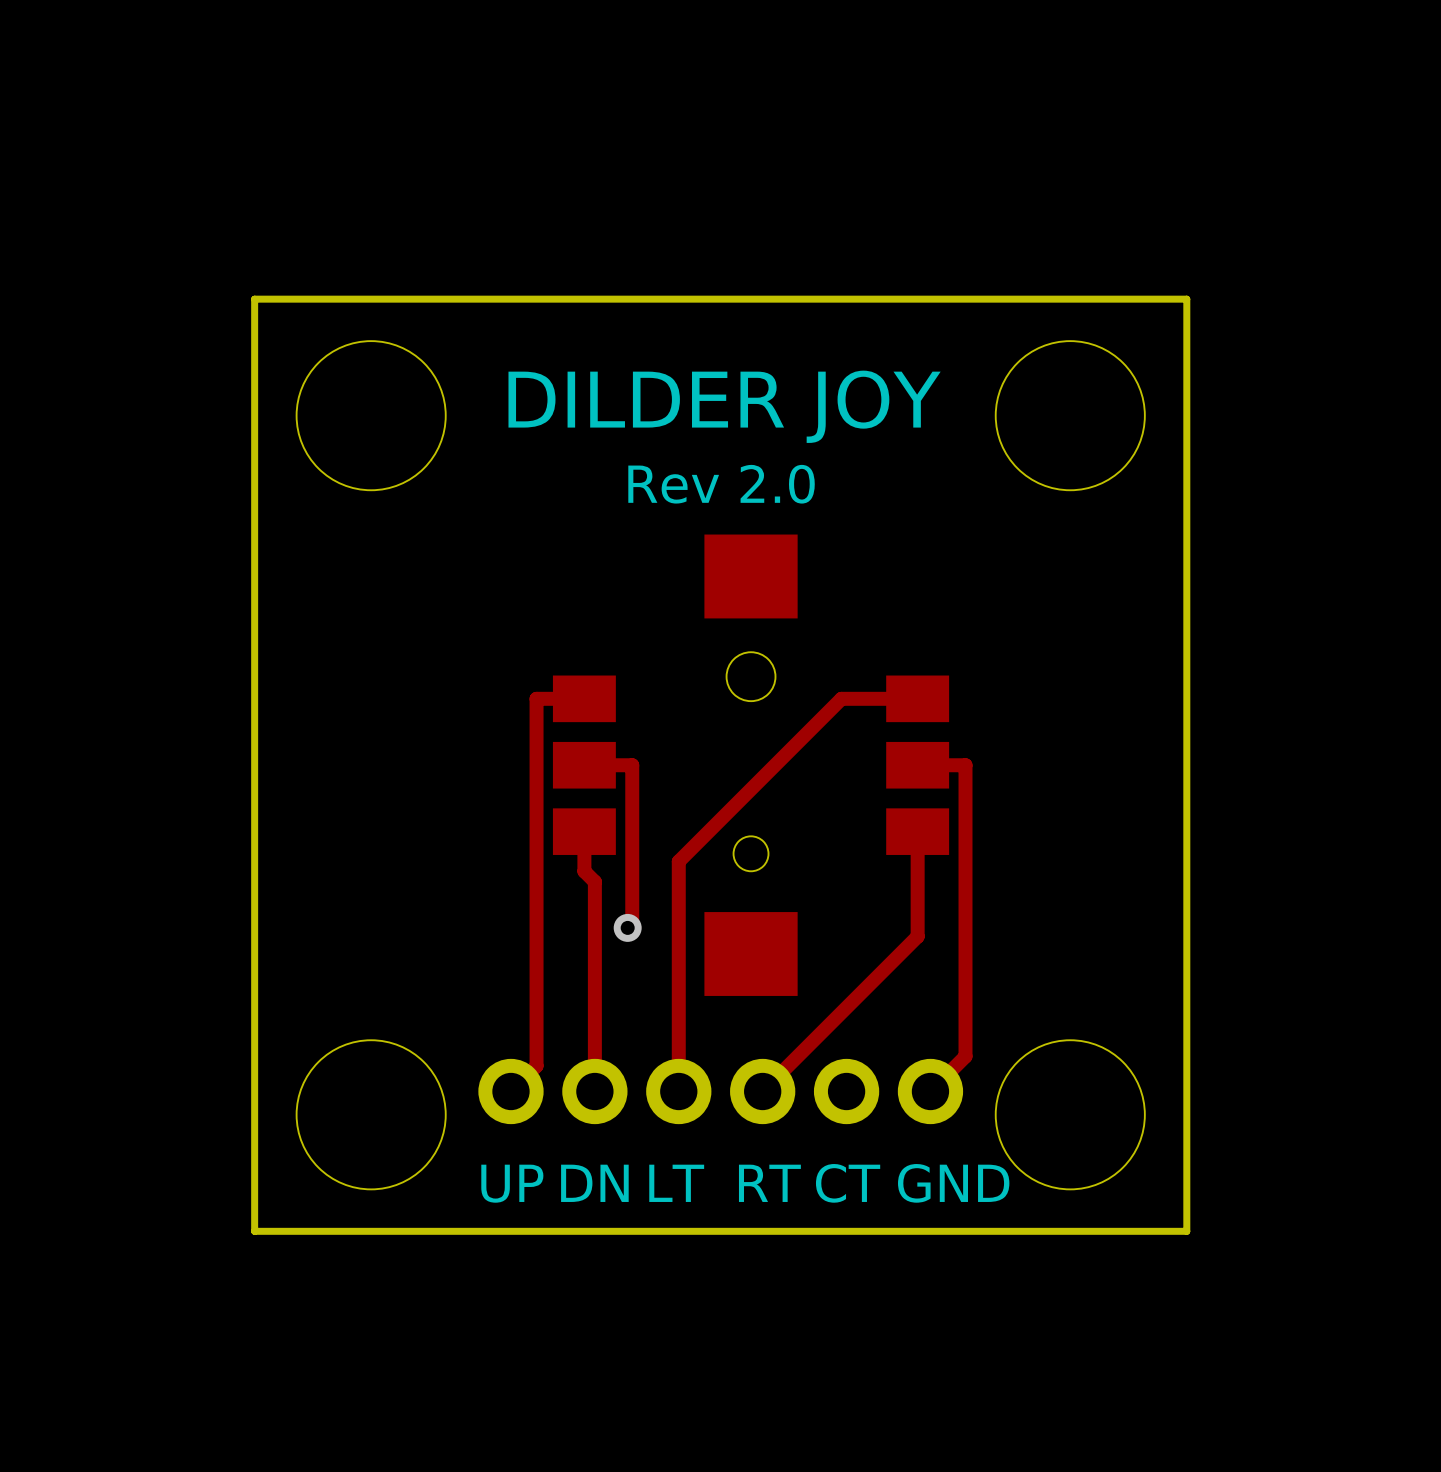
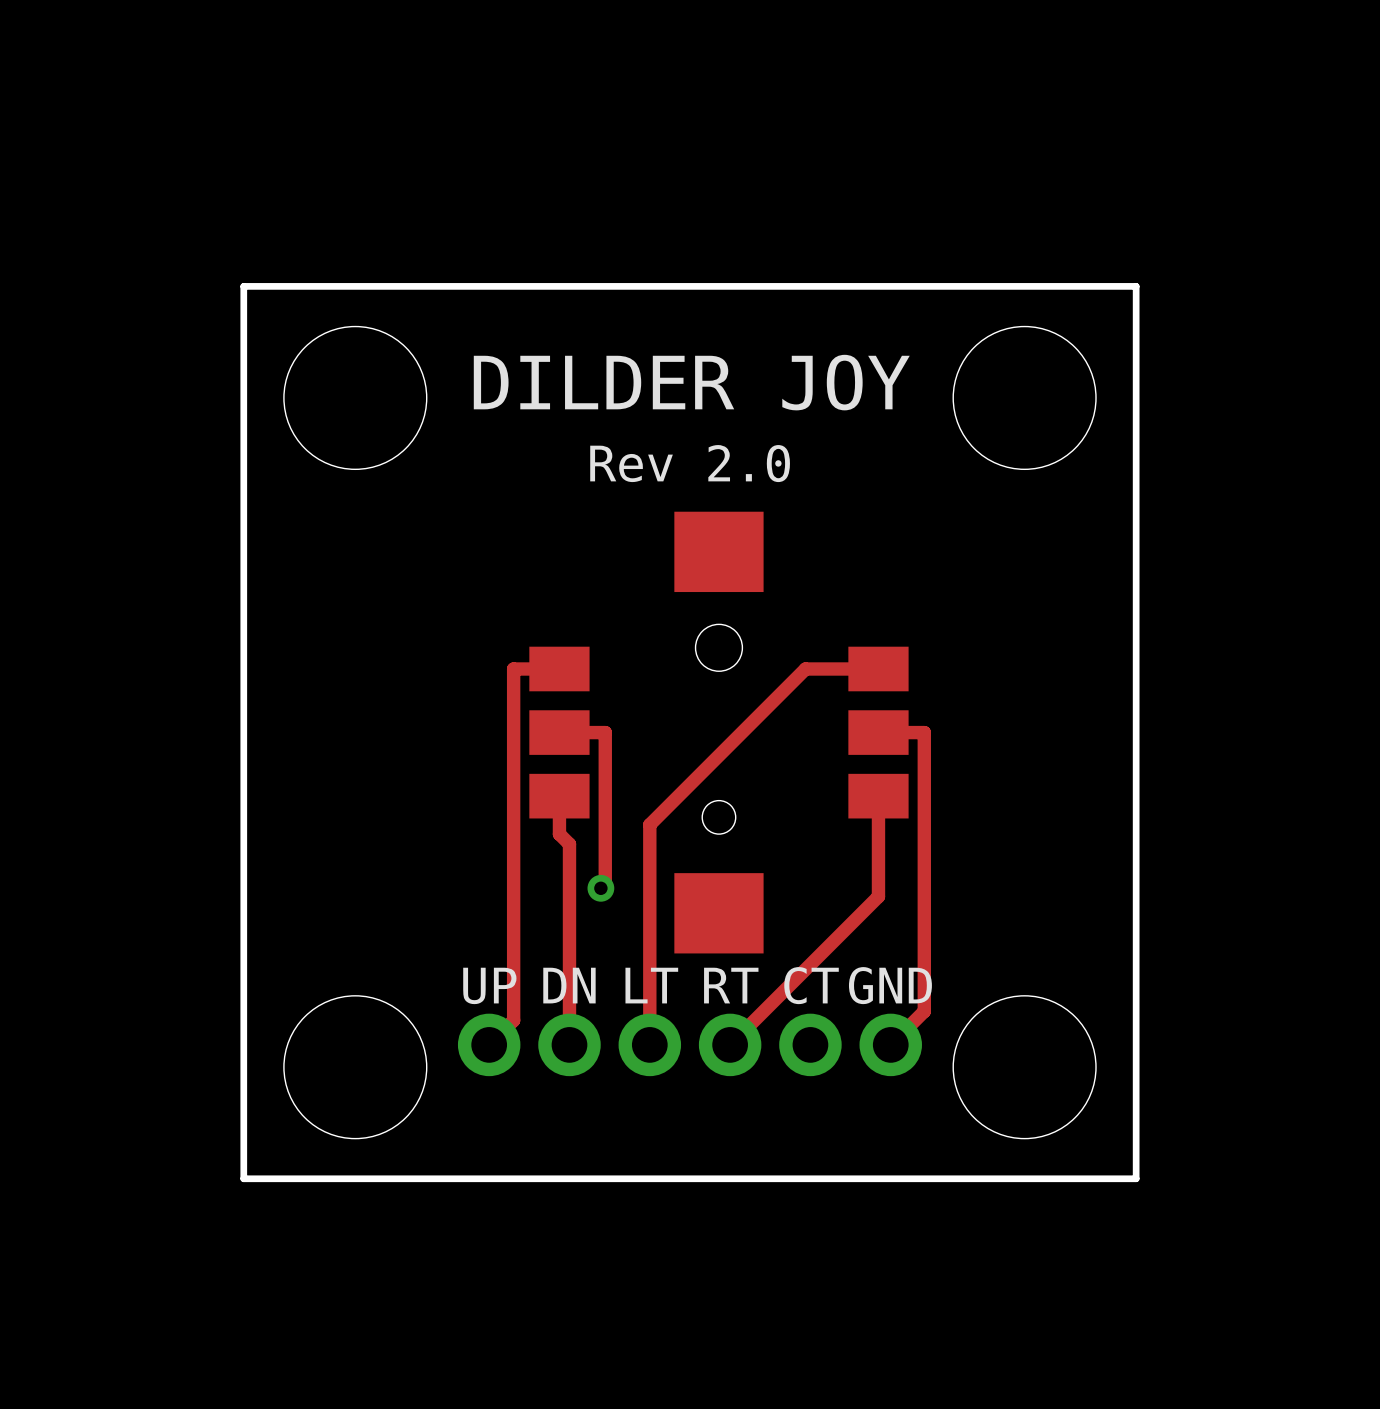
text position: UP (512, 1183) -> UP (489, 985)
text position: DN (594, 1183) -> DN (569, 985)
text position: LT (676, 1183) -> LT (651, 985)
text position: RT (769, 1183) -> RT (731, 985)
text position: CT (848, 1183) -> CT (811, 985)
text position: GND (953, 1183) -> GND (890, 985)

